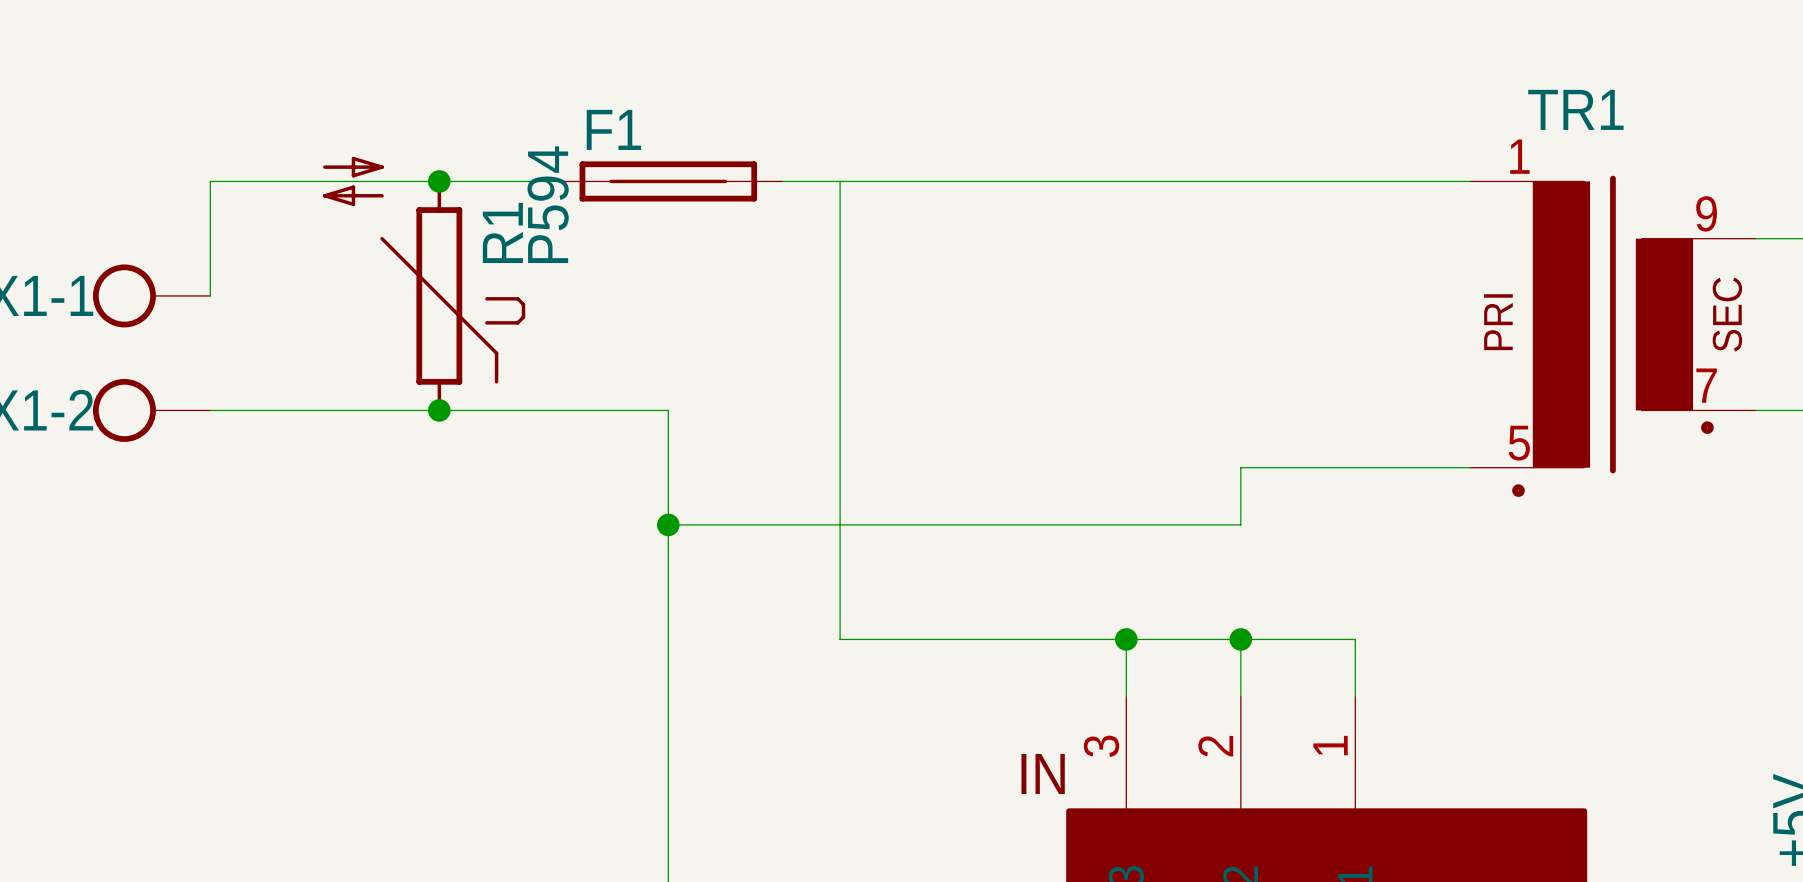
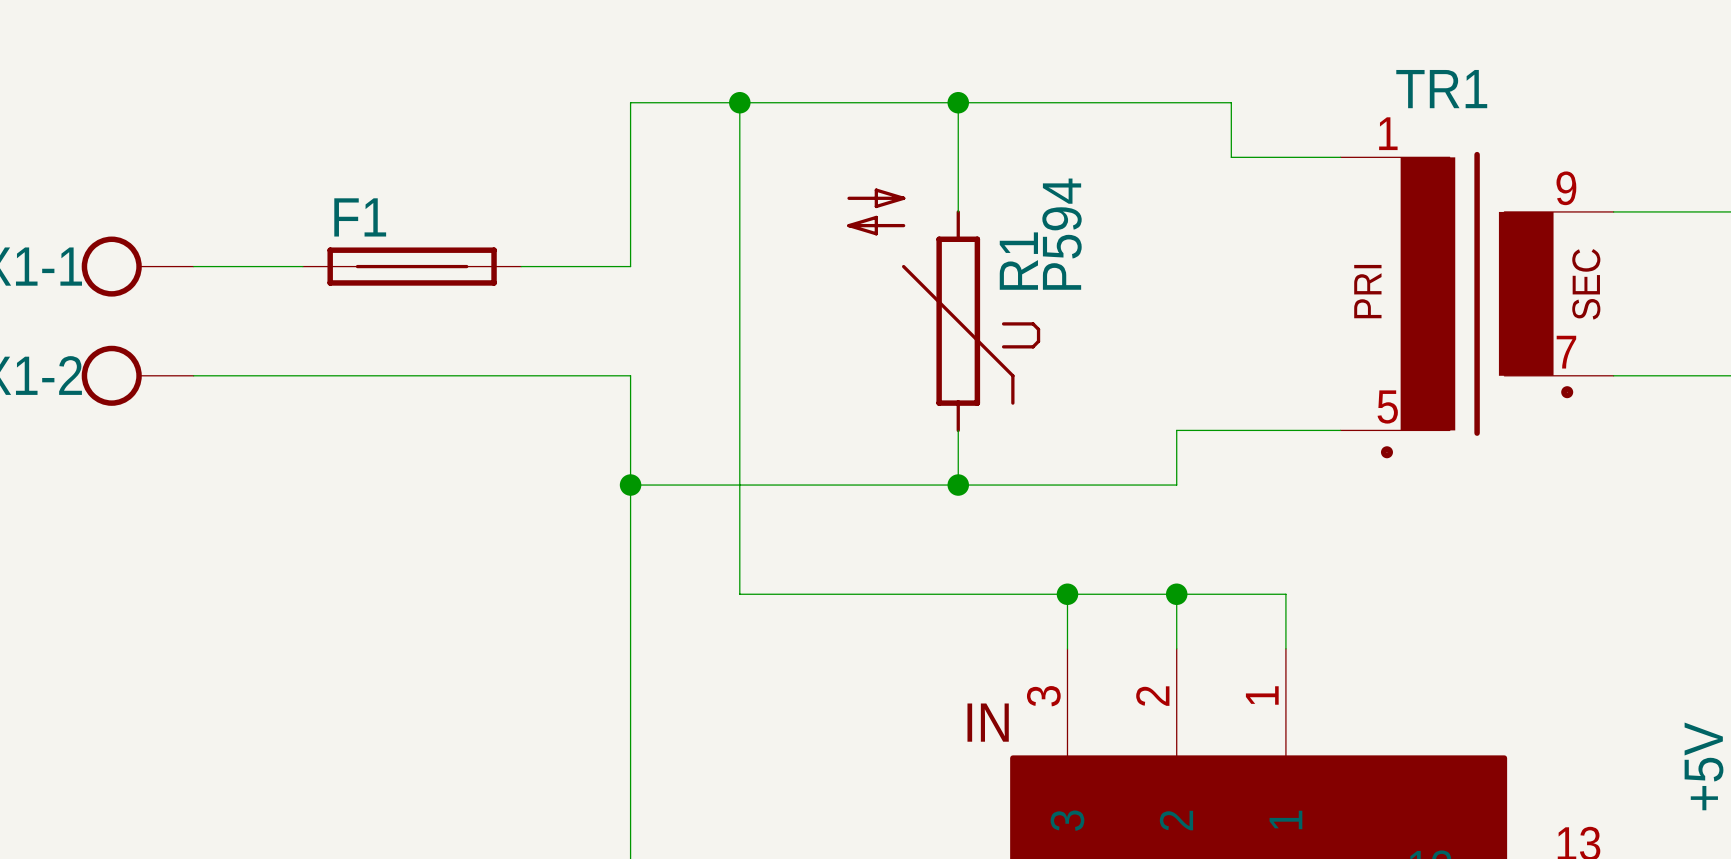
junction: none -> (739, 102)
wire: none -> (958, 102) (958, 211)
junction: none -> (958, 102)
junction: (439, 181) -> none
wire: (553, 181) (210, 181) (210, 295) -> (302, 266) (193, 266)
F1 position: (668, 181) -> (412, 266)
wire: (782, 181) (1298, 181) -> (521, 266) (630, 266) (630, 102) (1231, 102) (1231, 157)
wire: (840, 181) (840, 639) -> (739, 102) (739, 594) (794, 594)
R1 position: (424, 284) -> (943, 310)
TR1 position: (1612, 336) -> (1477, 305)
junction: (439, 410) -> none
wire: none -> (958, 430) (958, 485)
junction: none -> (958, 485)

